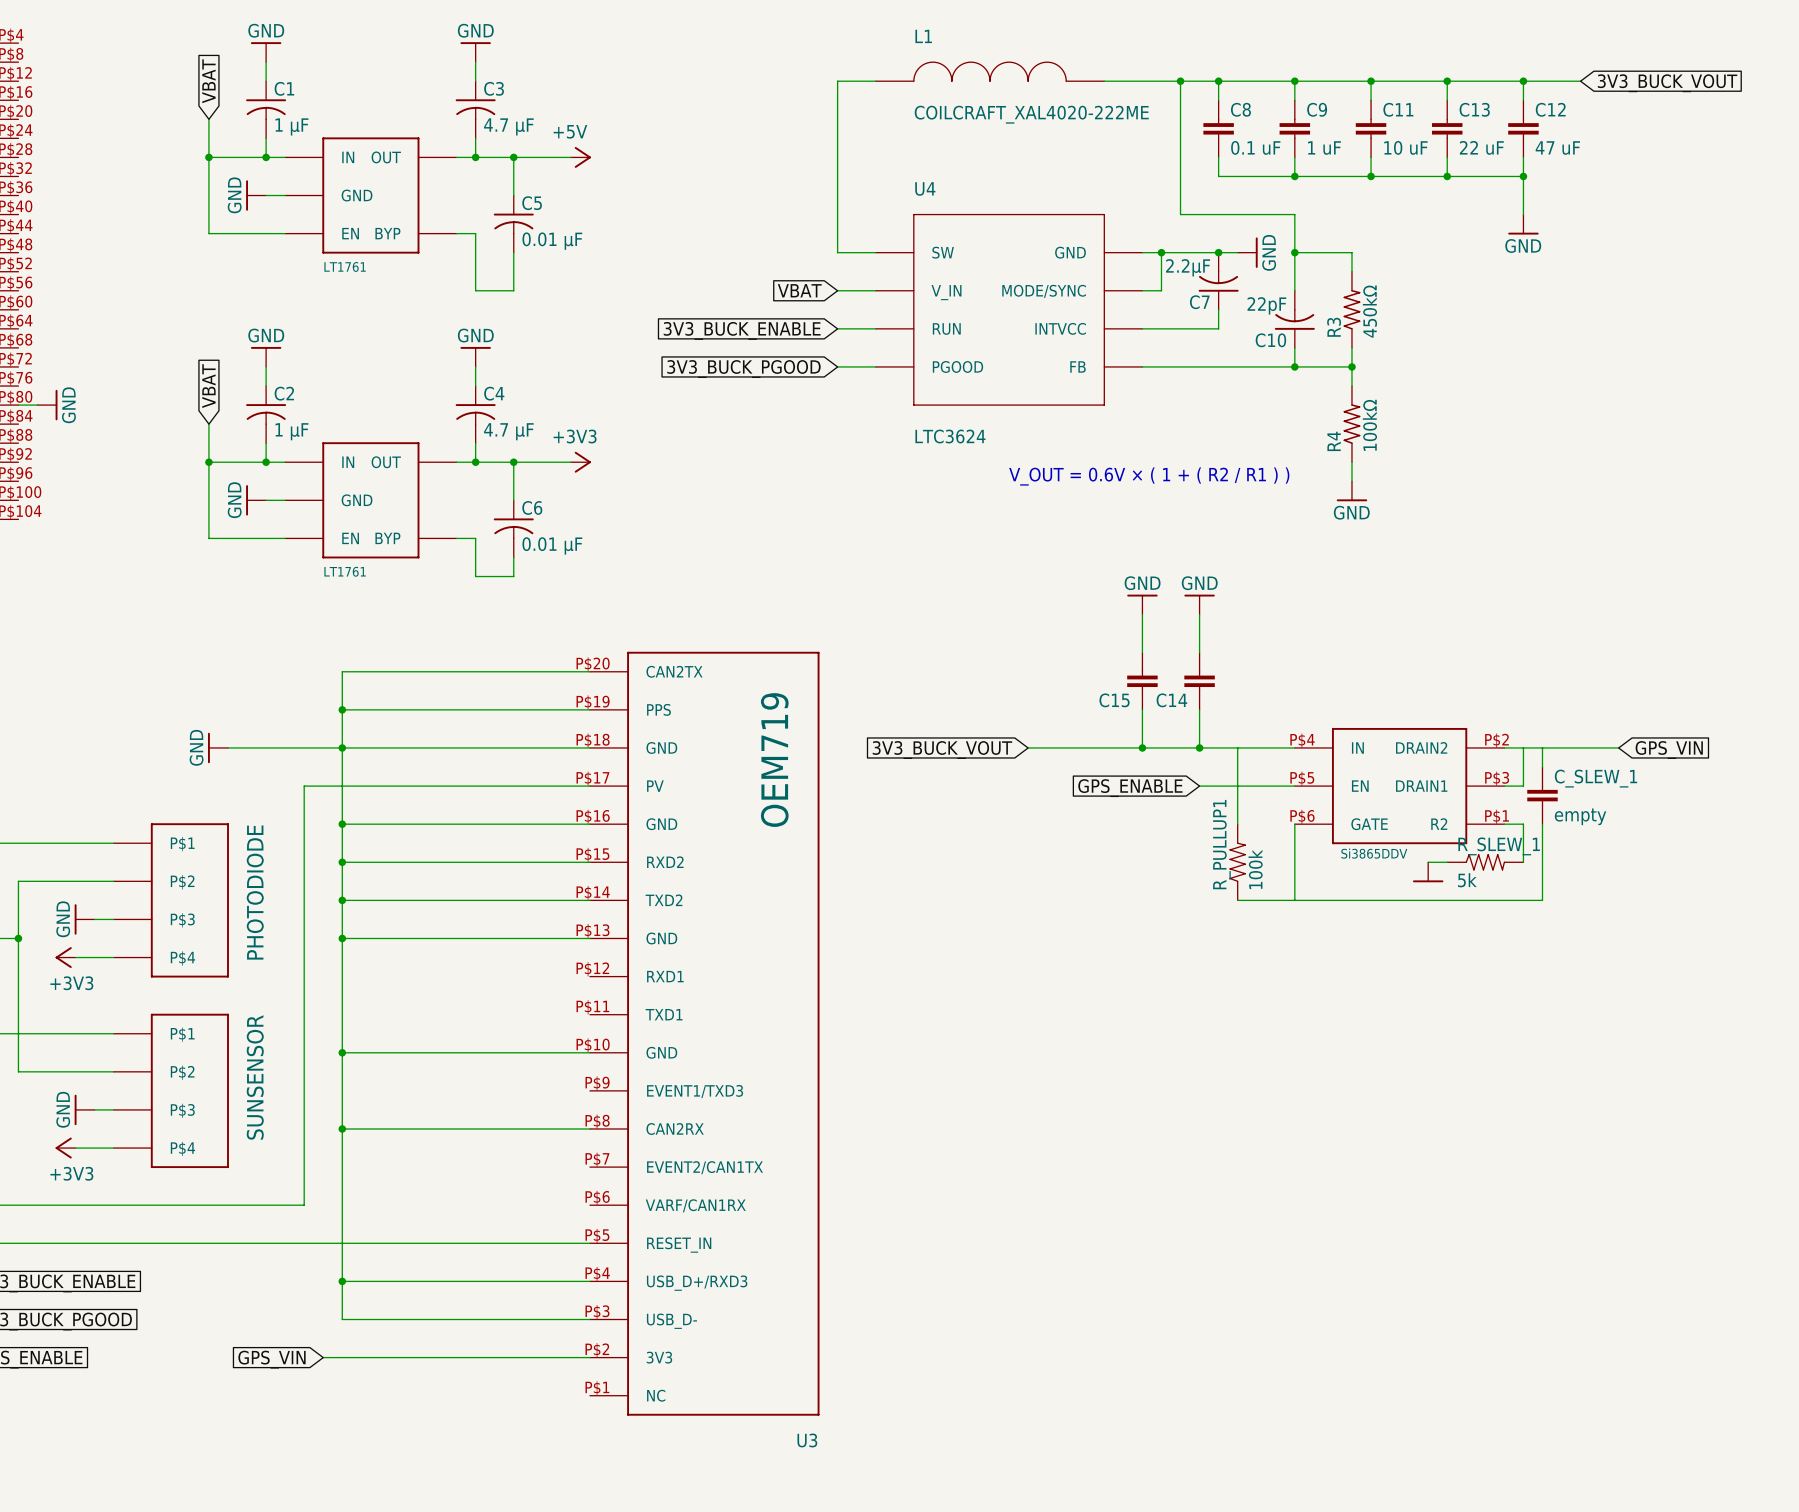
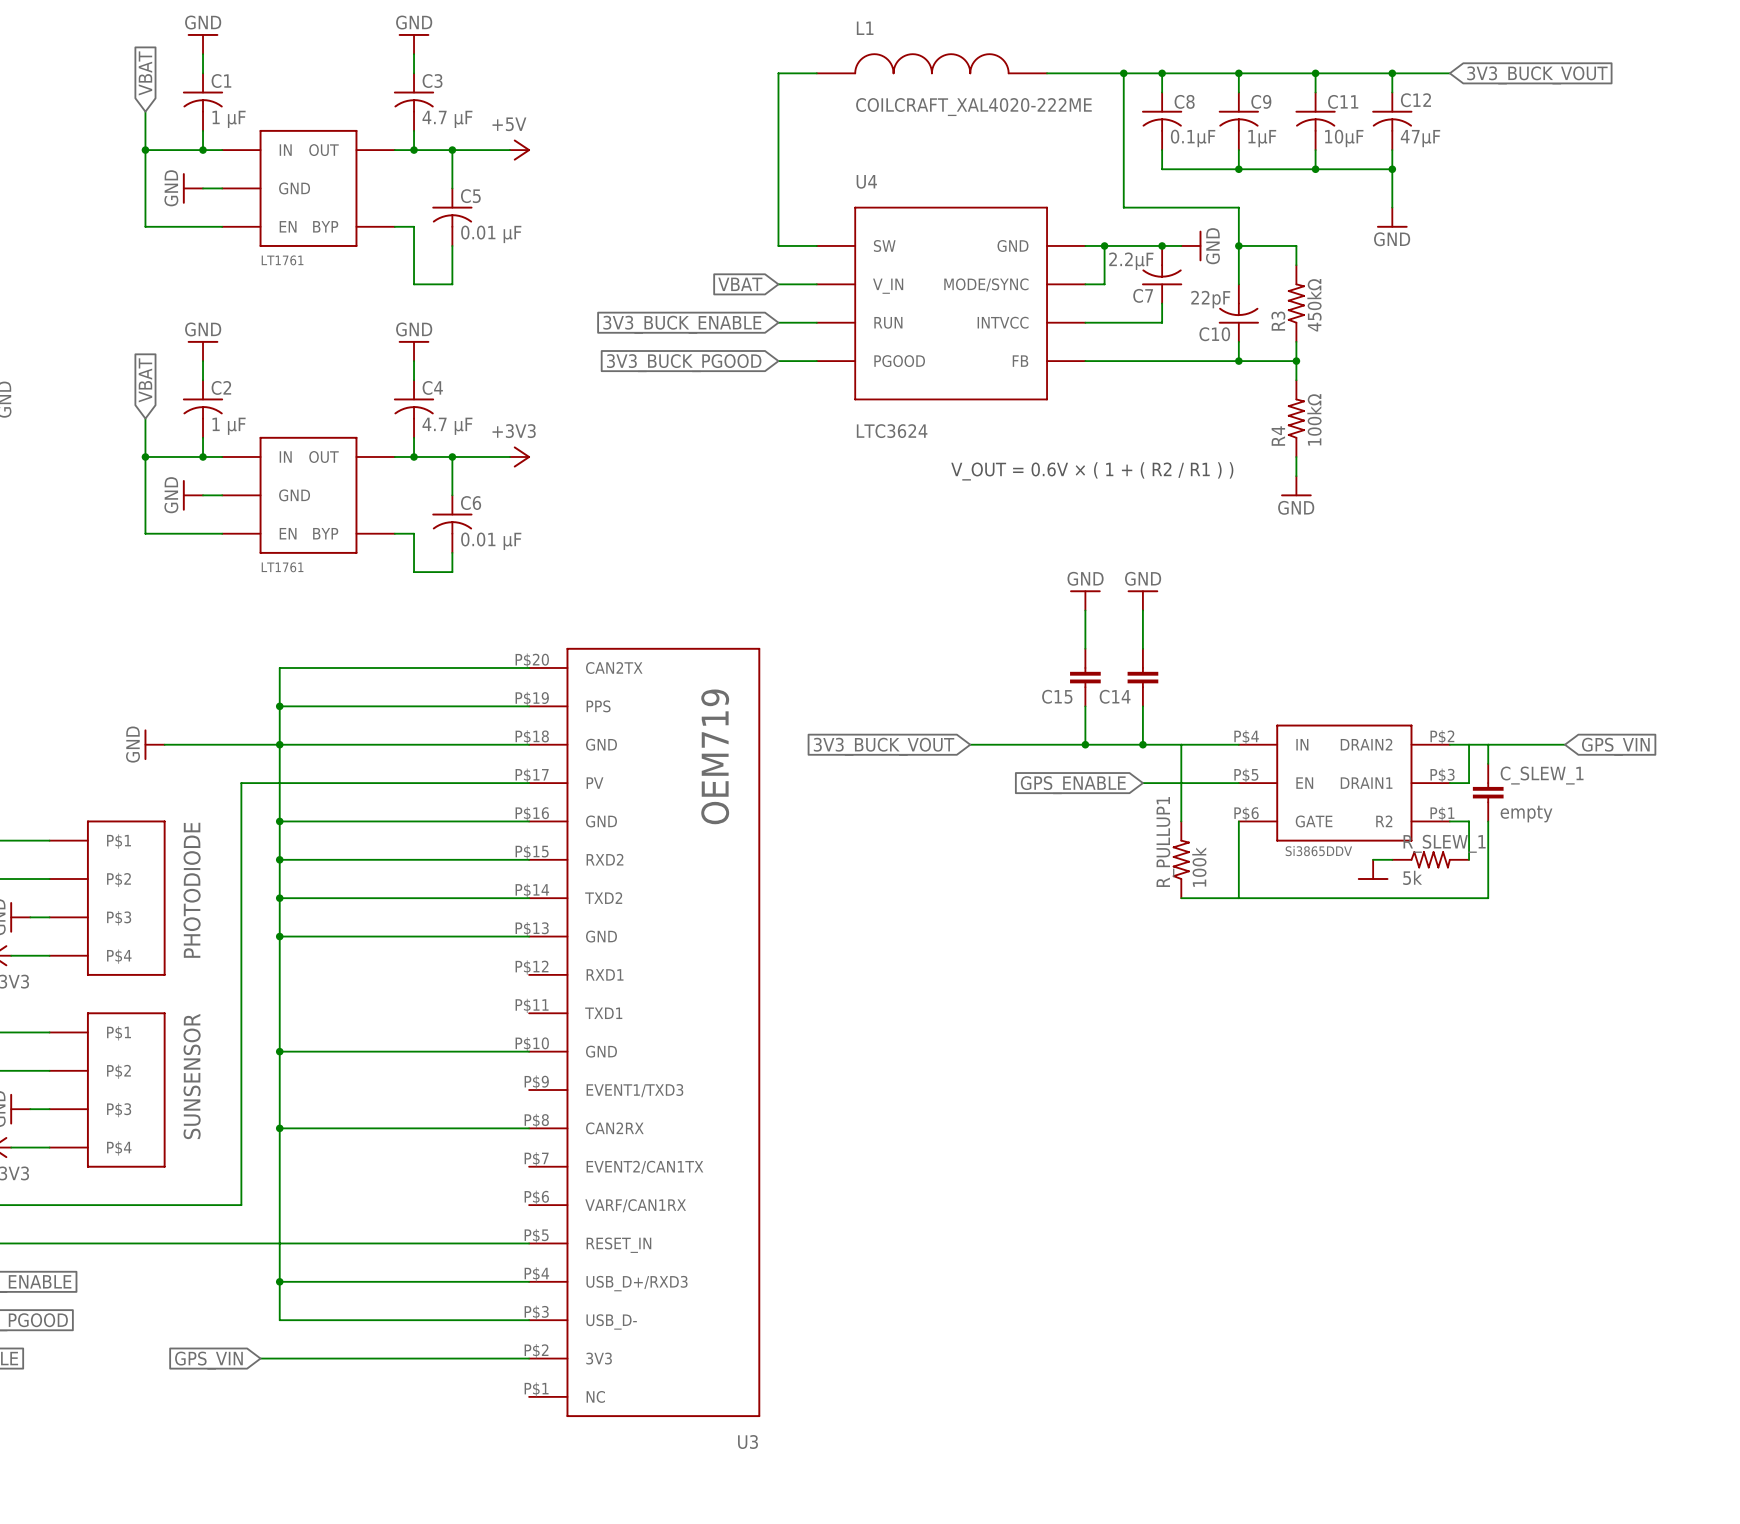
wire: (1504, 81) (1580, 81) -> none
wire: (1523, 81) (1523, 100) -> none
junction: (1523, 81) -> none
global label position: 3V3_BUCK_VOUT (1667, 83) -> 3V3_BUCK_VOUT (1537, 75)
C8 symbol: [1203, 100, 1234, 158] -> [1141, 92, 1183, 151]
C9 symbol: [1279, 100, 1311, 158] -> [1218, 92, 1259, 151]
C11 symbol: [1355, 100, 1387, 158] -> [1295, 92, 1336, 151]
C12 symbol: [1508, 100, 1539, 158] -> [1372, 92, 1413, 151]
C13: 22 uF (1447, 128) -> none
C8 value: 0.1 uF (1255, 147) -> 0.1µF (1193, 138)
C11 value: 10 uF (1405, 147) -> 10µF (1344, 138)
C9 value: 1 uF (1324, 148) -> 1µF (1262, 138)
C12 value: 47 uF (1557, 148) -> 47µF (1420, 138)
wire: (1523, 157) (1523, 214) -> none
wire: (1447, 176) (1523, 176) -> (1392, 169) (1392, 207)
junction: (1523, 176) -> none
power symbol position: GND (1523, 224) -> GND (1392, 217)

